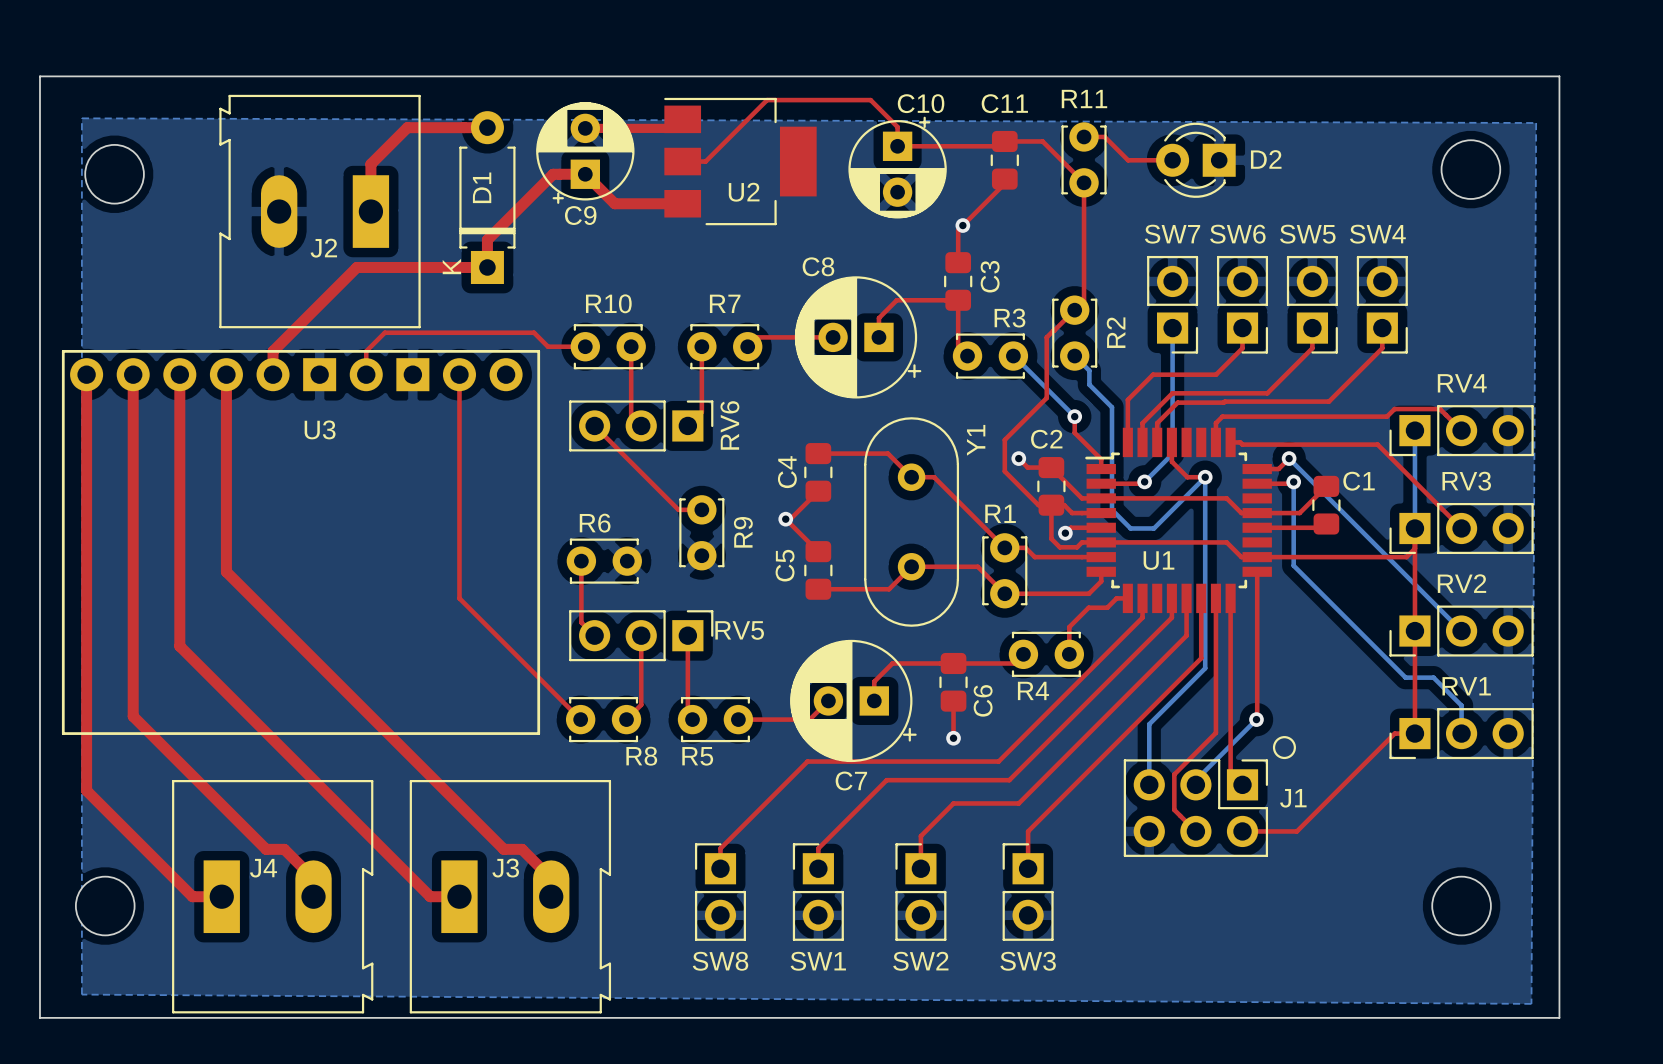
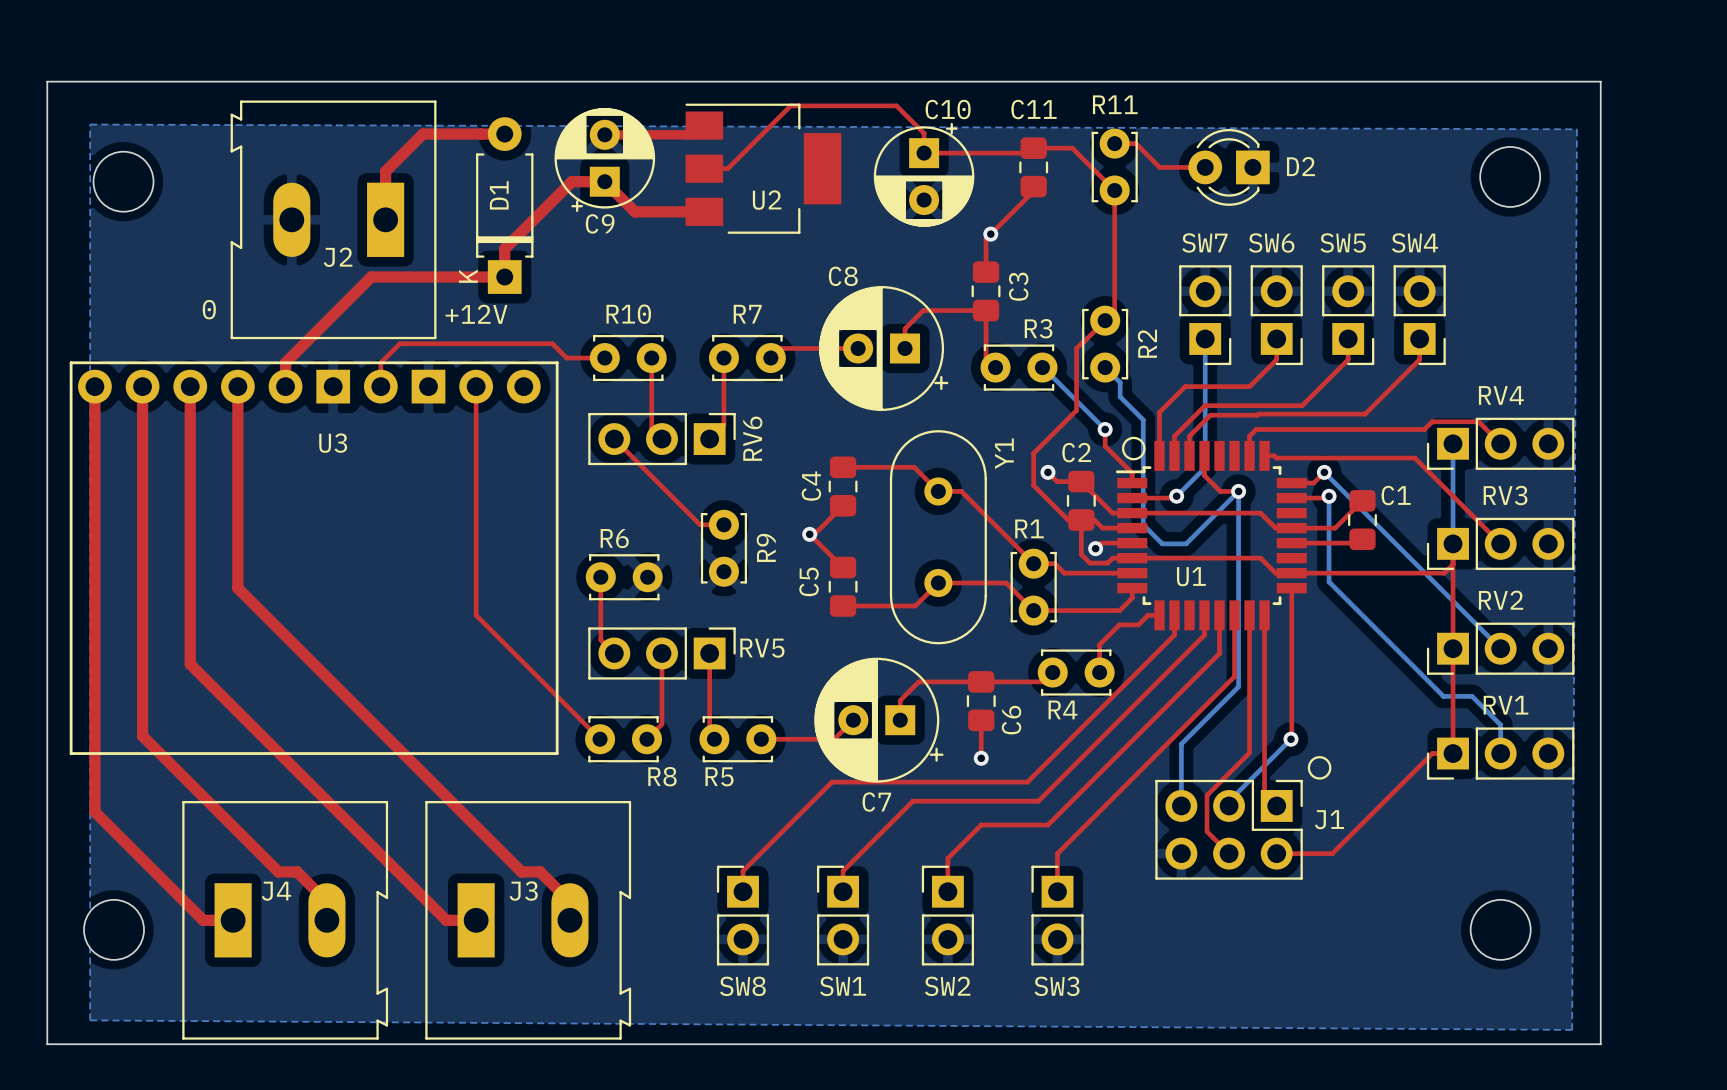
text: none -> 0 (209, 309)
text: none -> +12V (476, 314)
drawing: none -> [1121, 436, 1146, 461]

